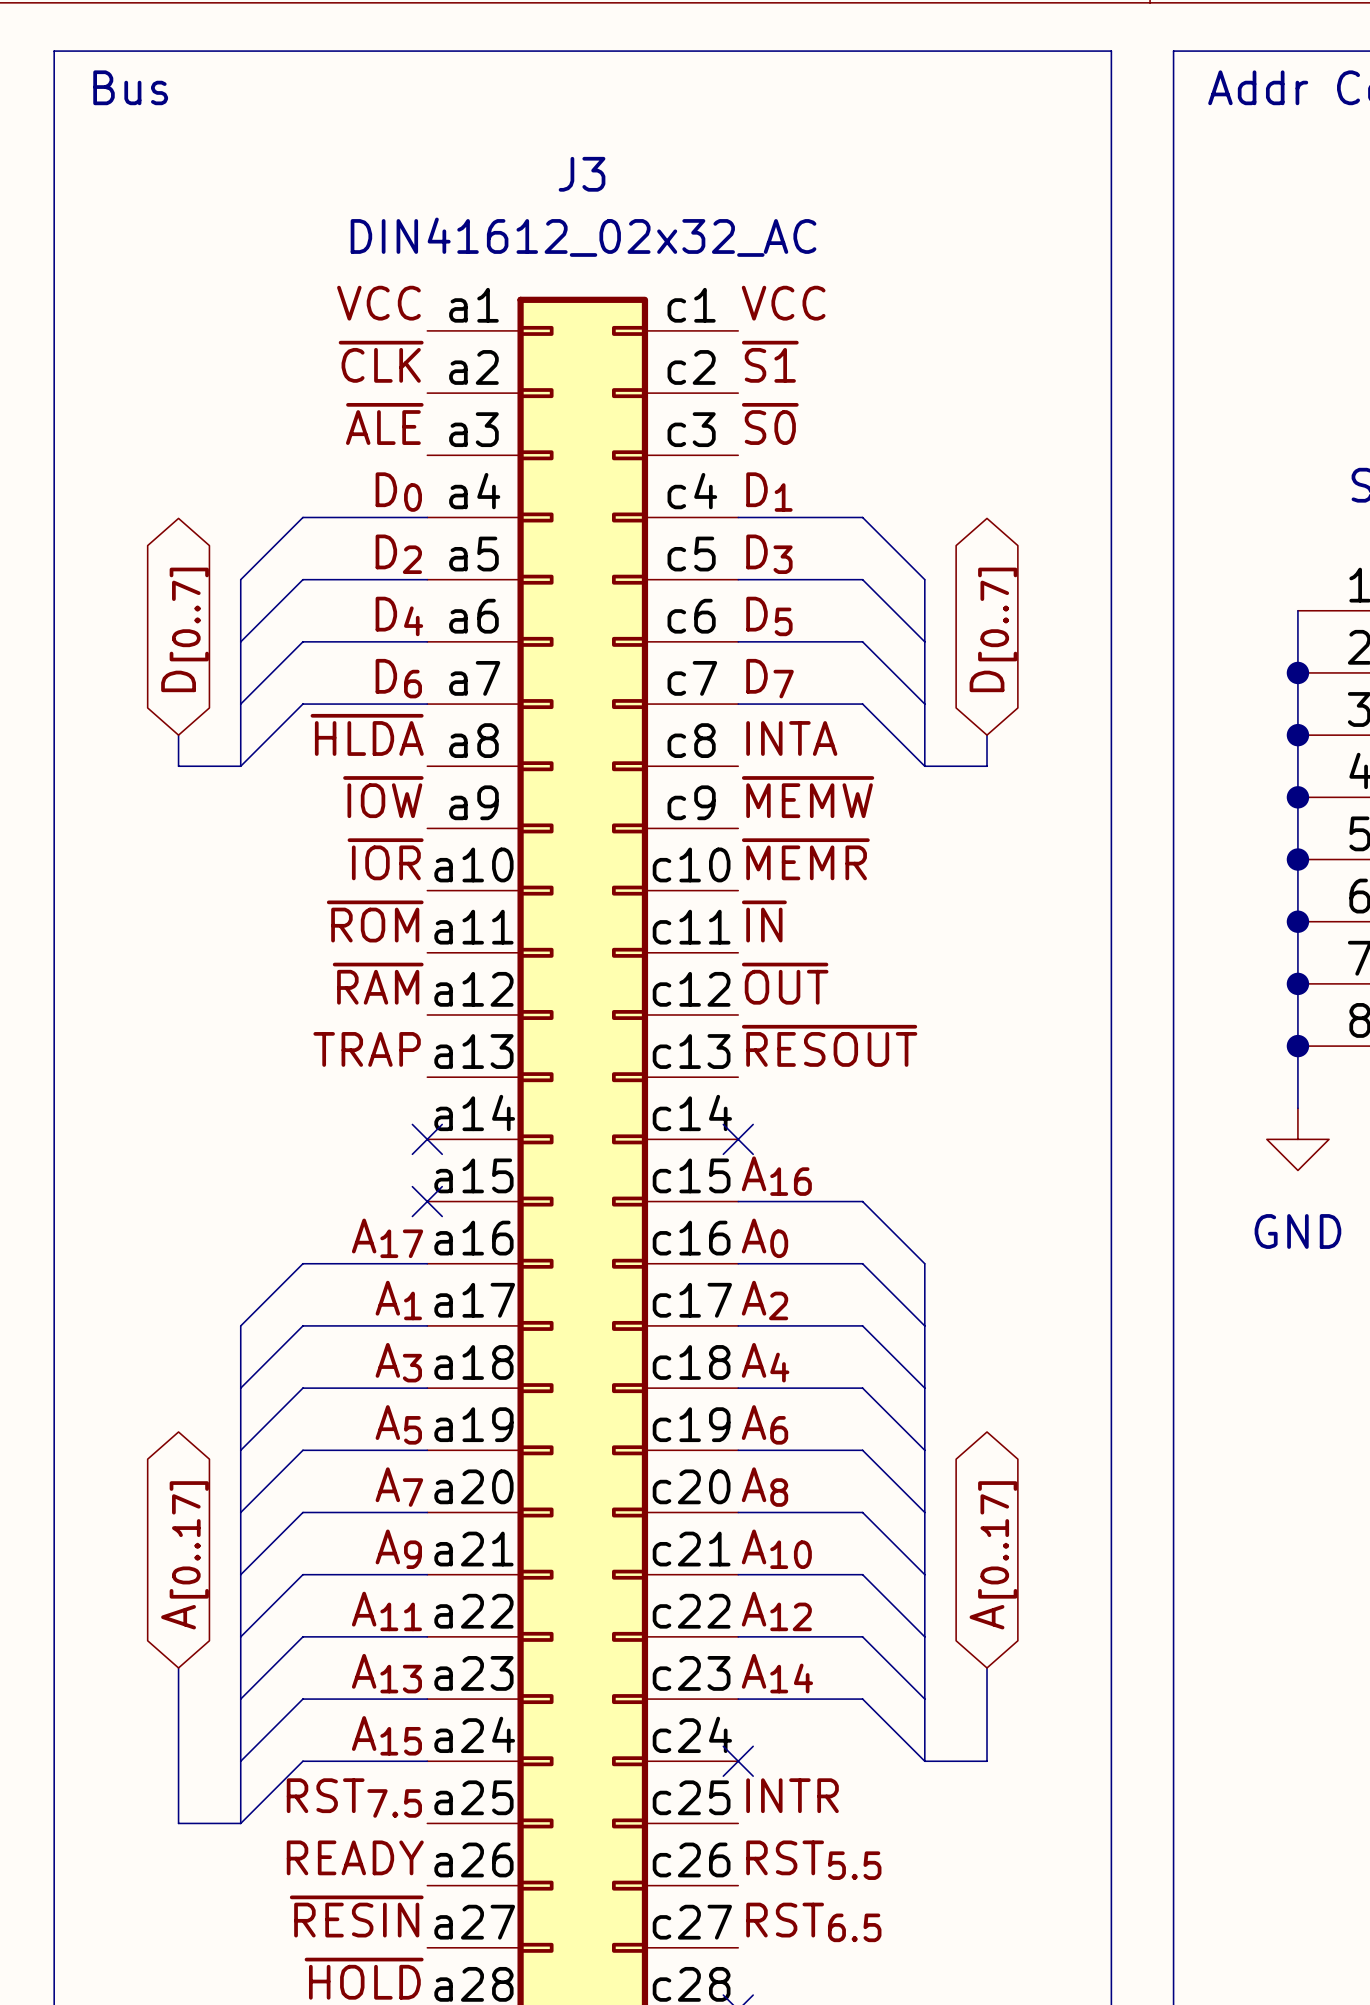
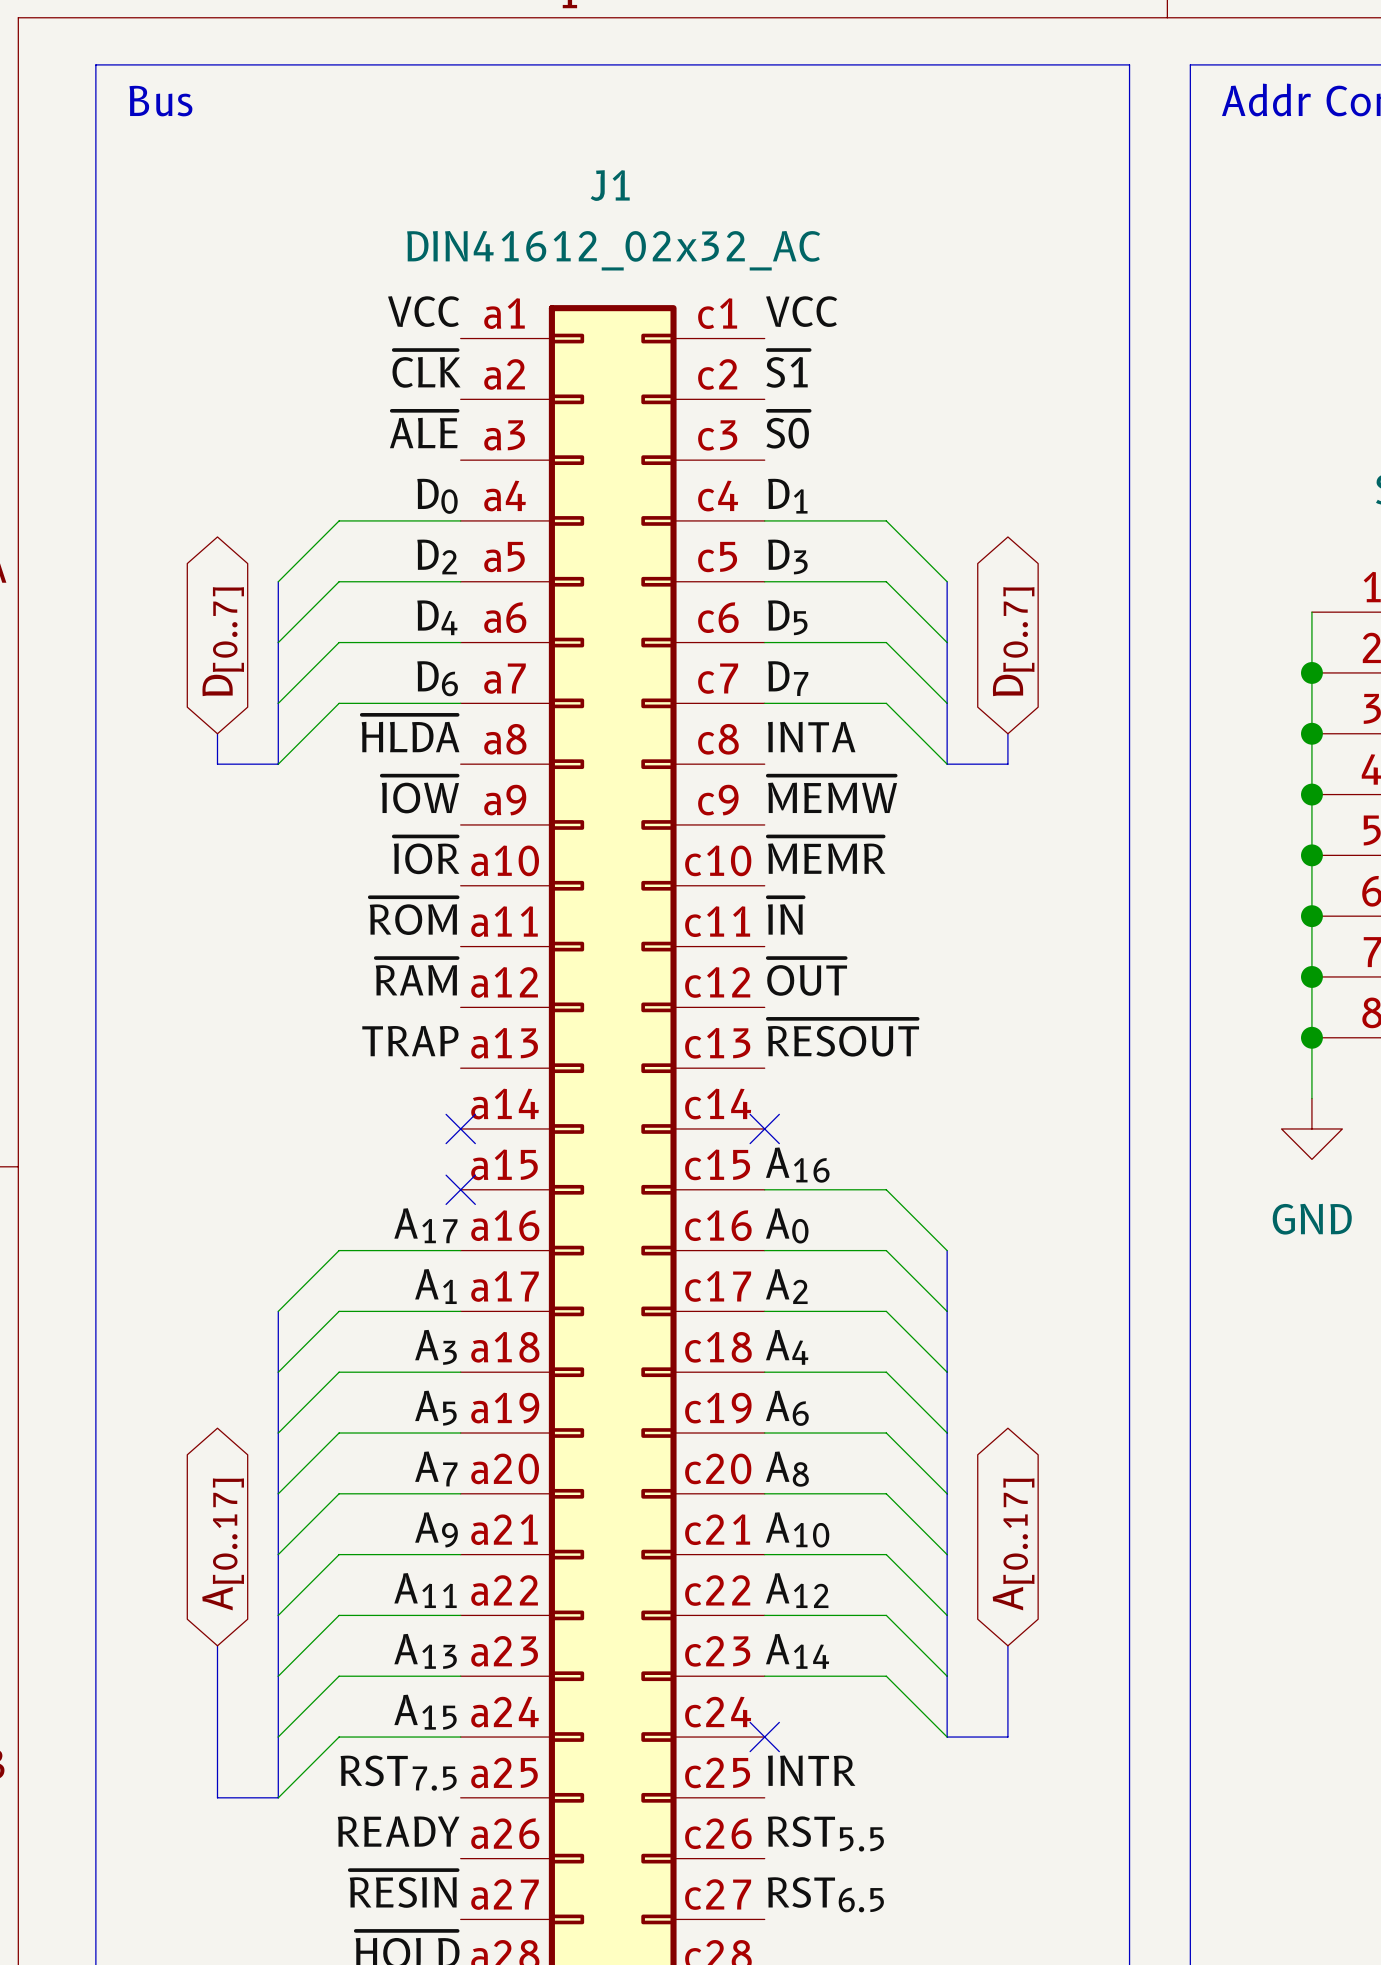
J3 name: J3 (582, 174) -> J1 (610, 185)

